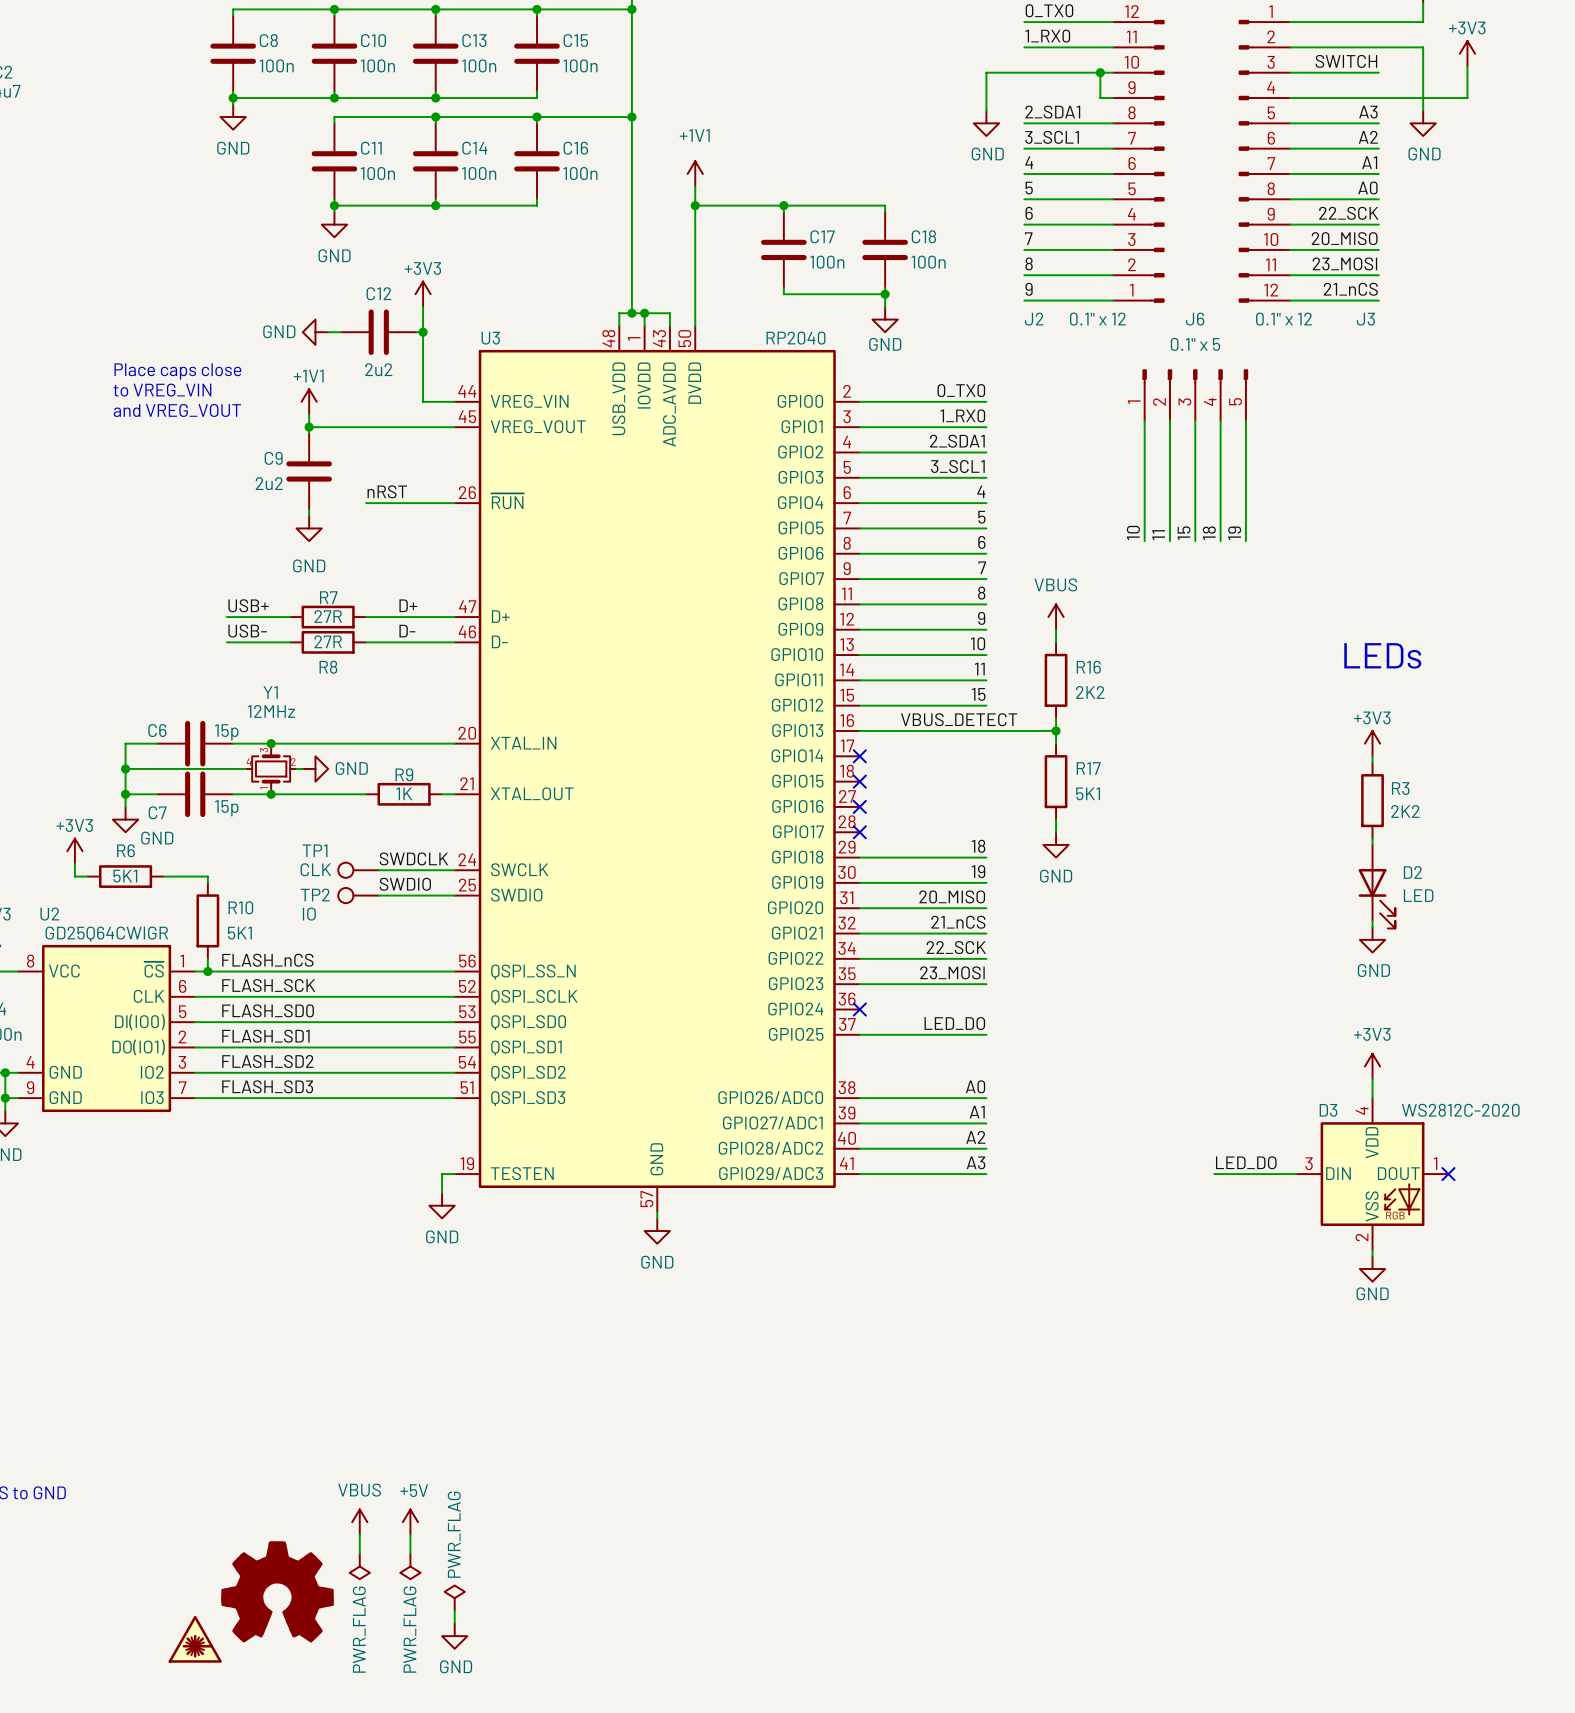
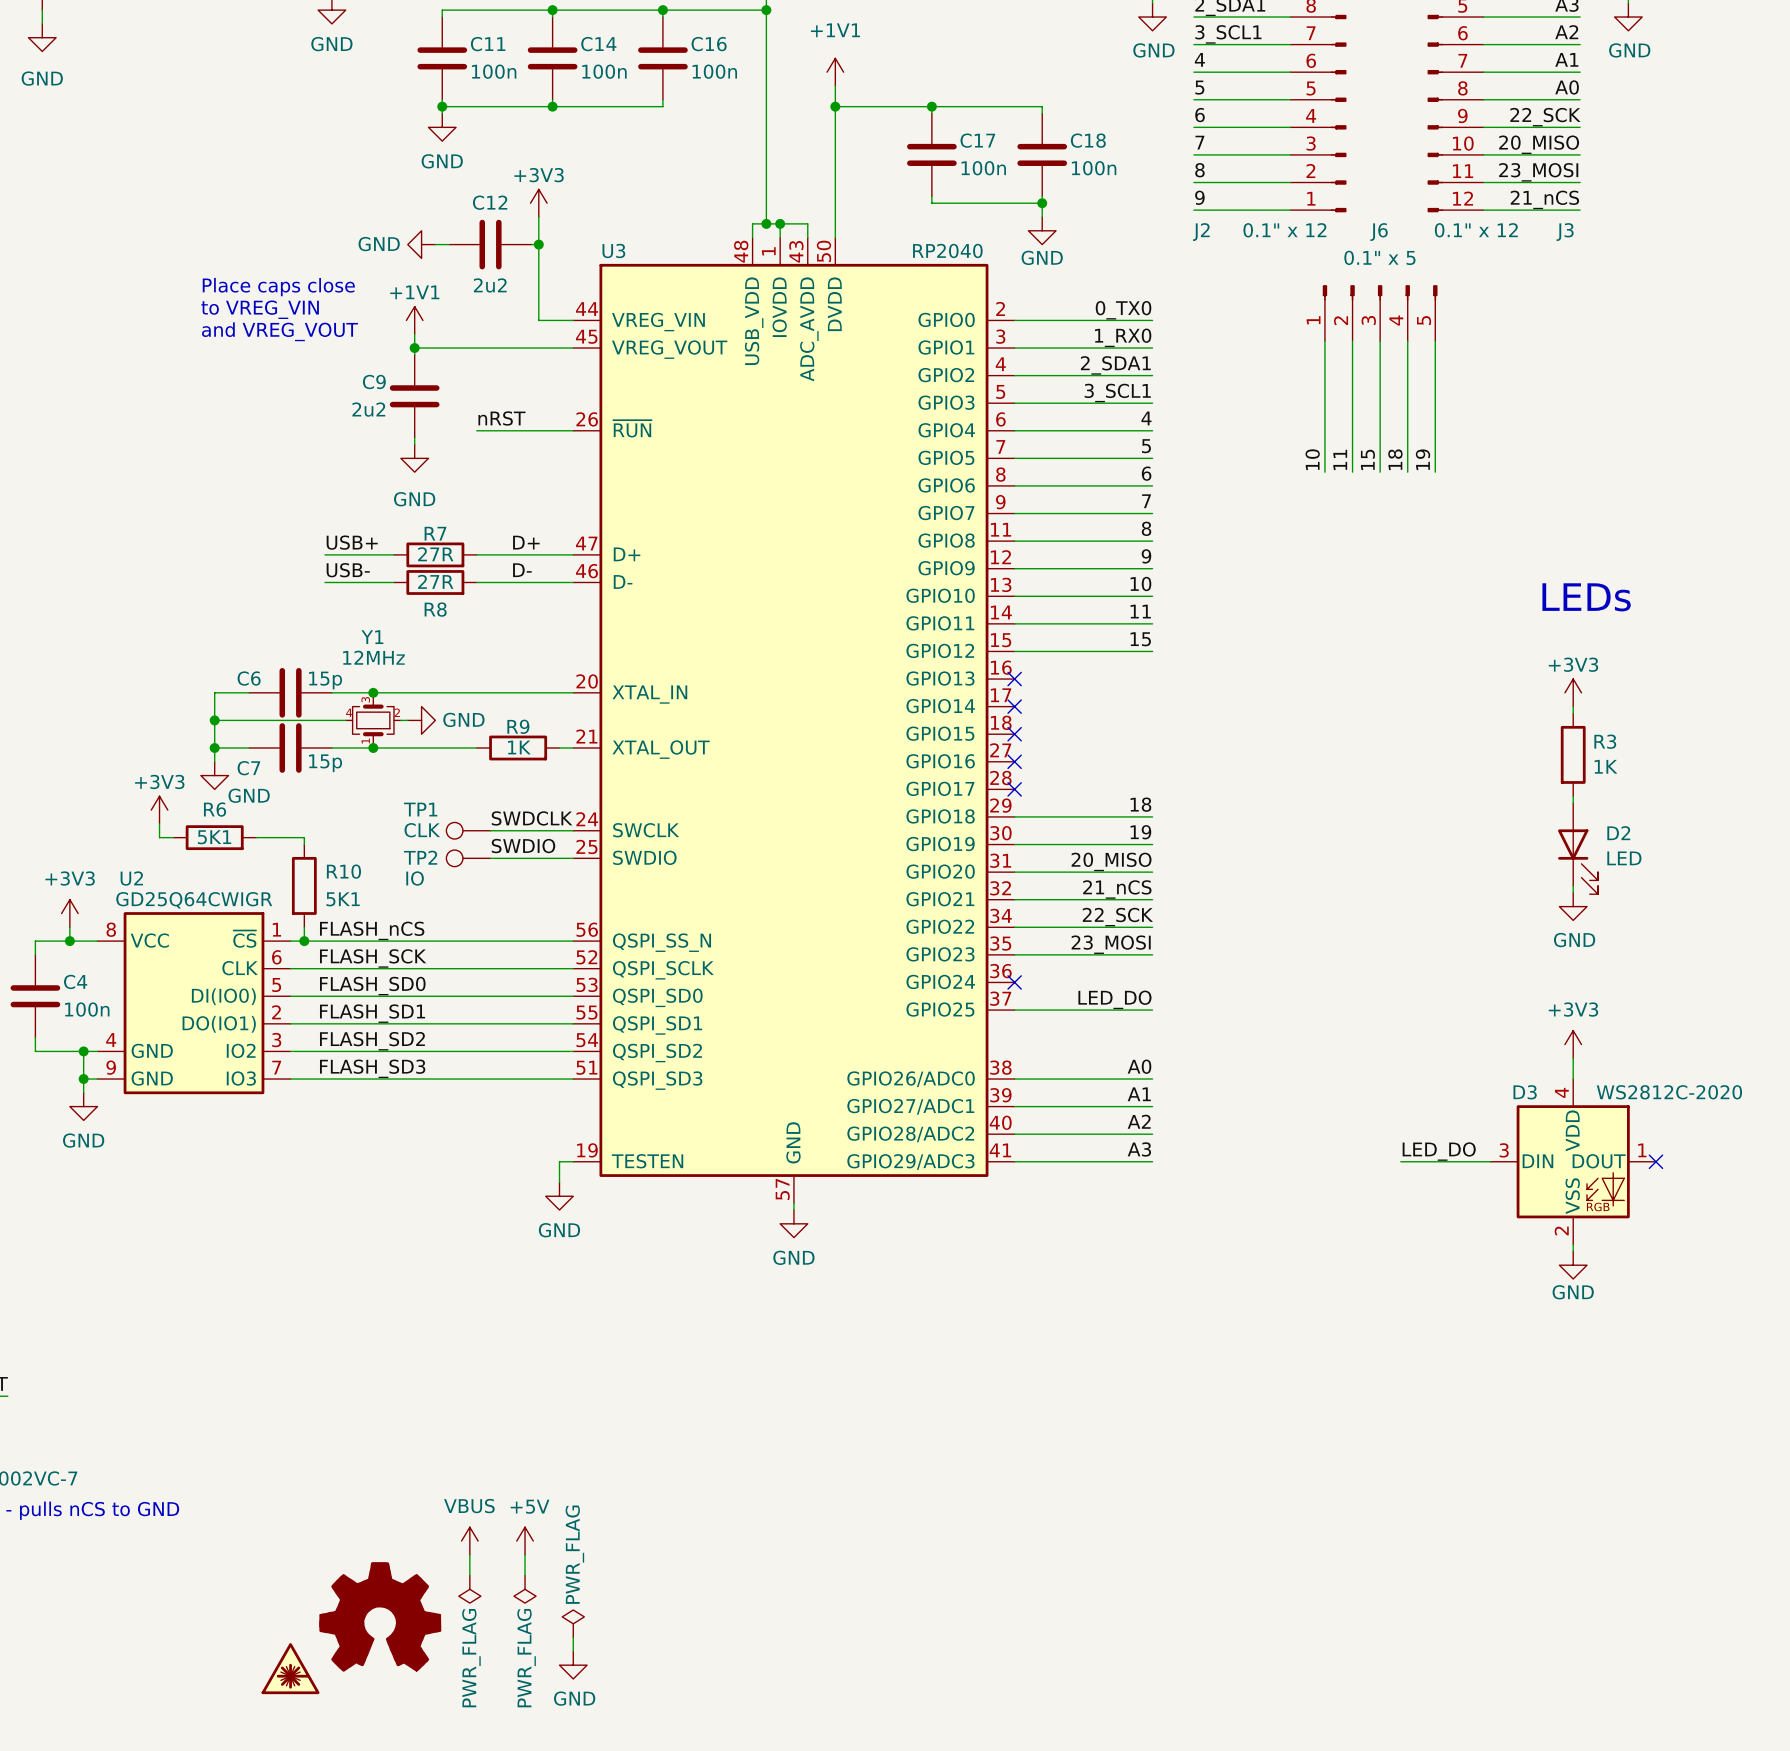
power symbol: VBUS (1056, 617) -> none
wire: (1056, 629) (1056, 642) -> none
R16: 2K2 (1056, 680) -> none
wire: (1056, 718) (1056, 743) -> none
label: VBUS_DETECT (959, 719) -> none
wire: (859, 730) (1056, 730) -> none
no-connect mark: none -> (1014, 679)
junction: (1056, 730) -> none
R17: 5K1 (1056, 781) -> none
R3 value: 2K2 (1405, 811) -> 1K (1605, 766)
wire: (1056, 819) (1056, 832) -> none
power symbol: GND (1056, 844) -> none

